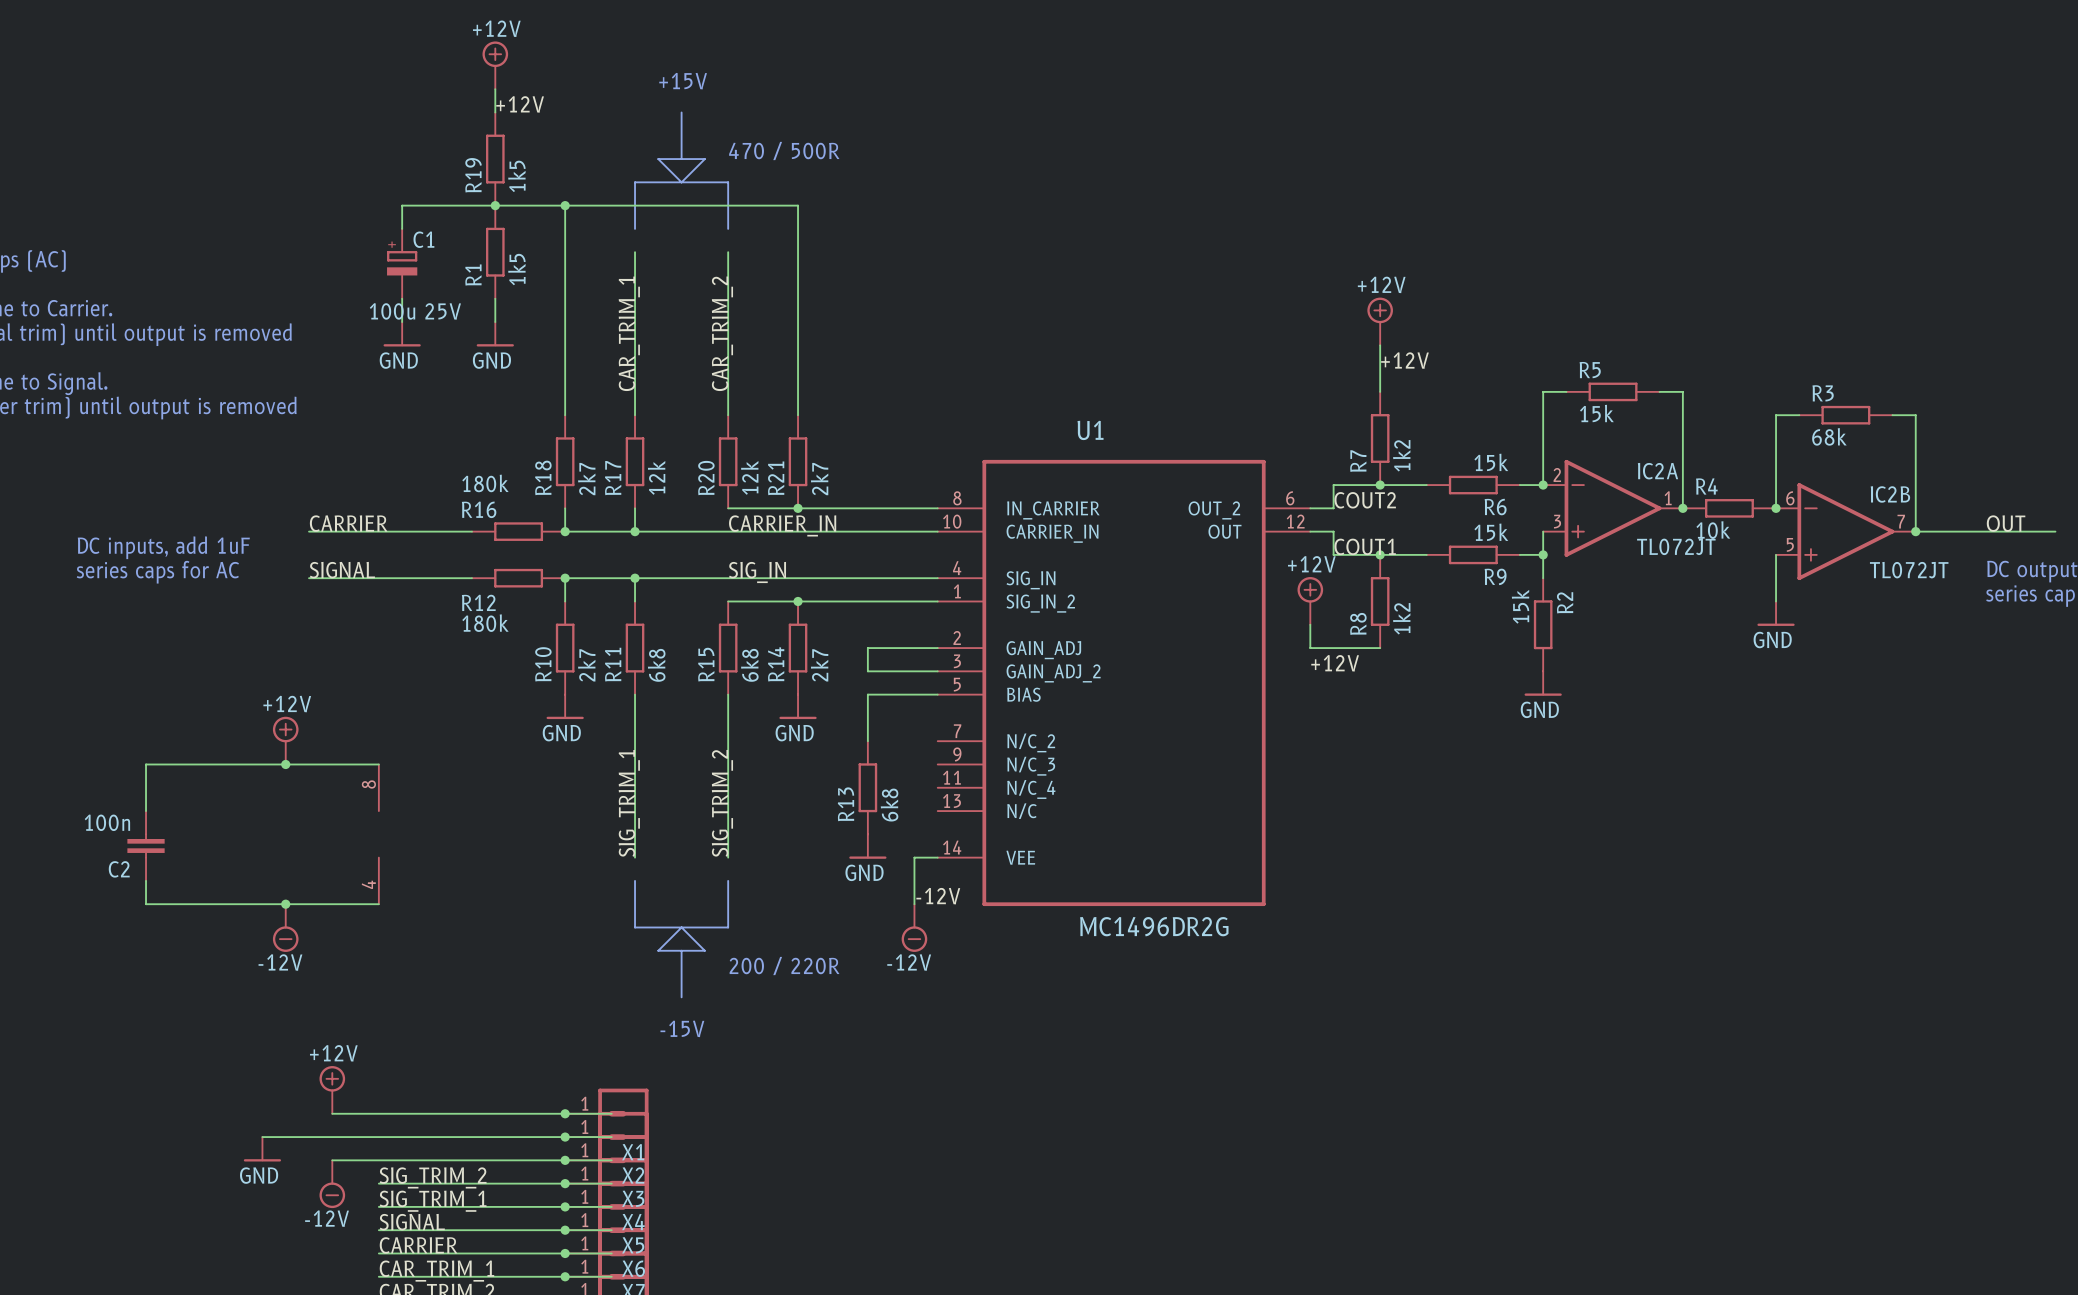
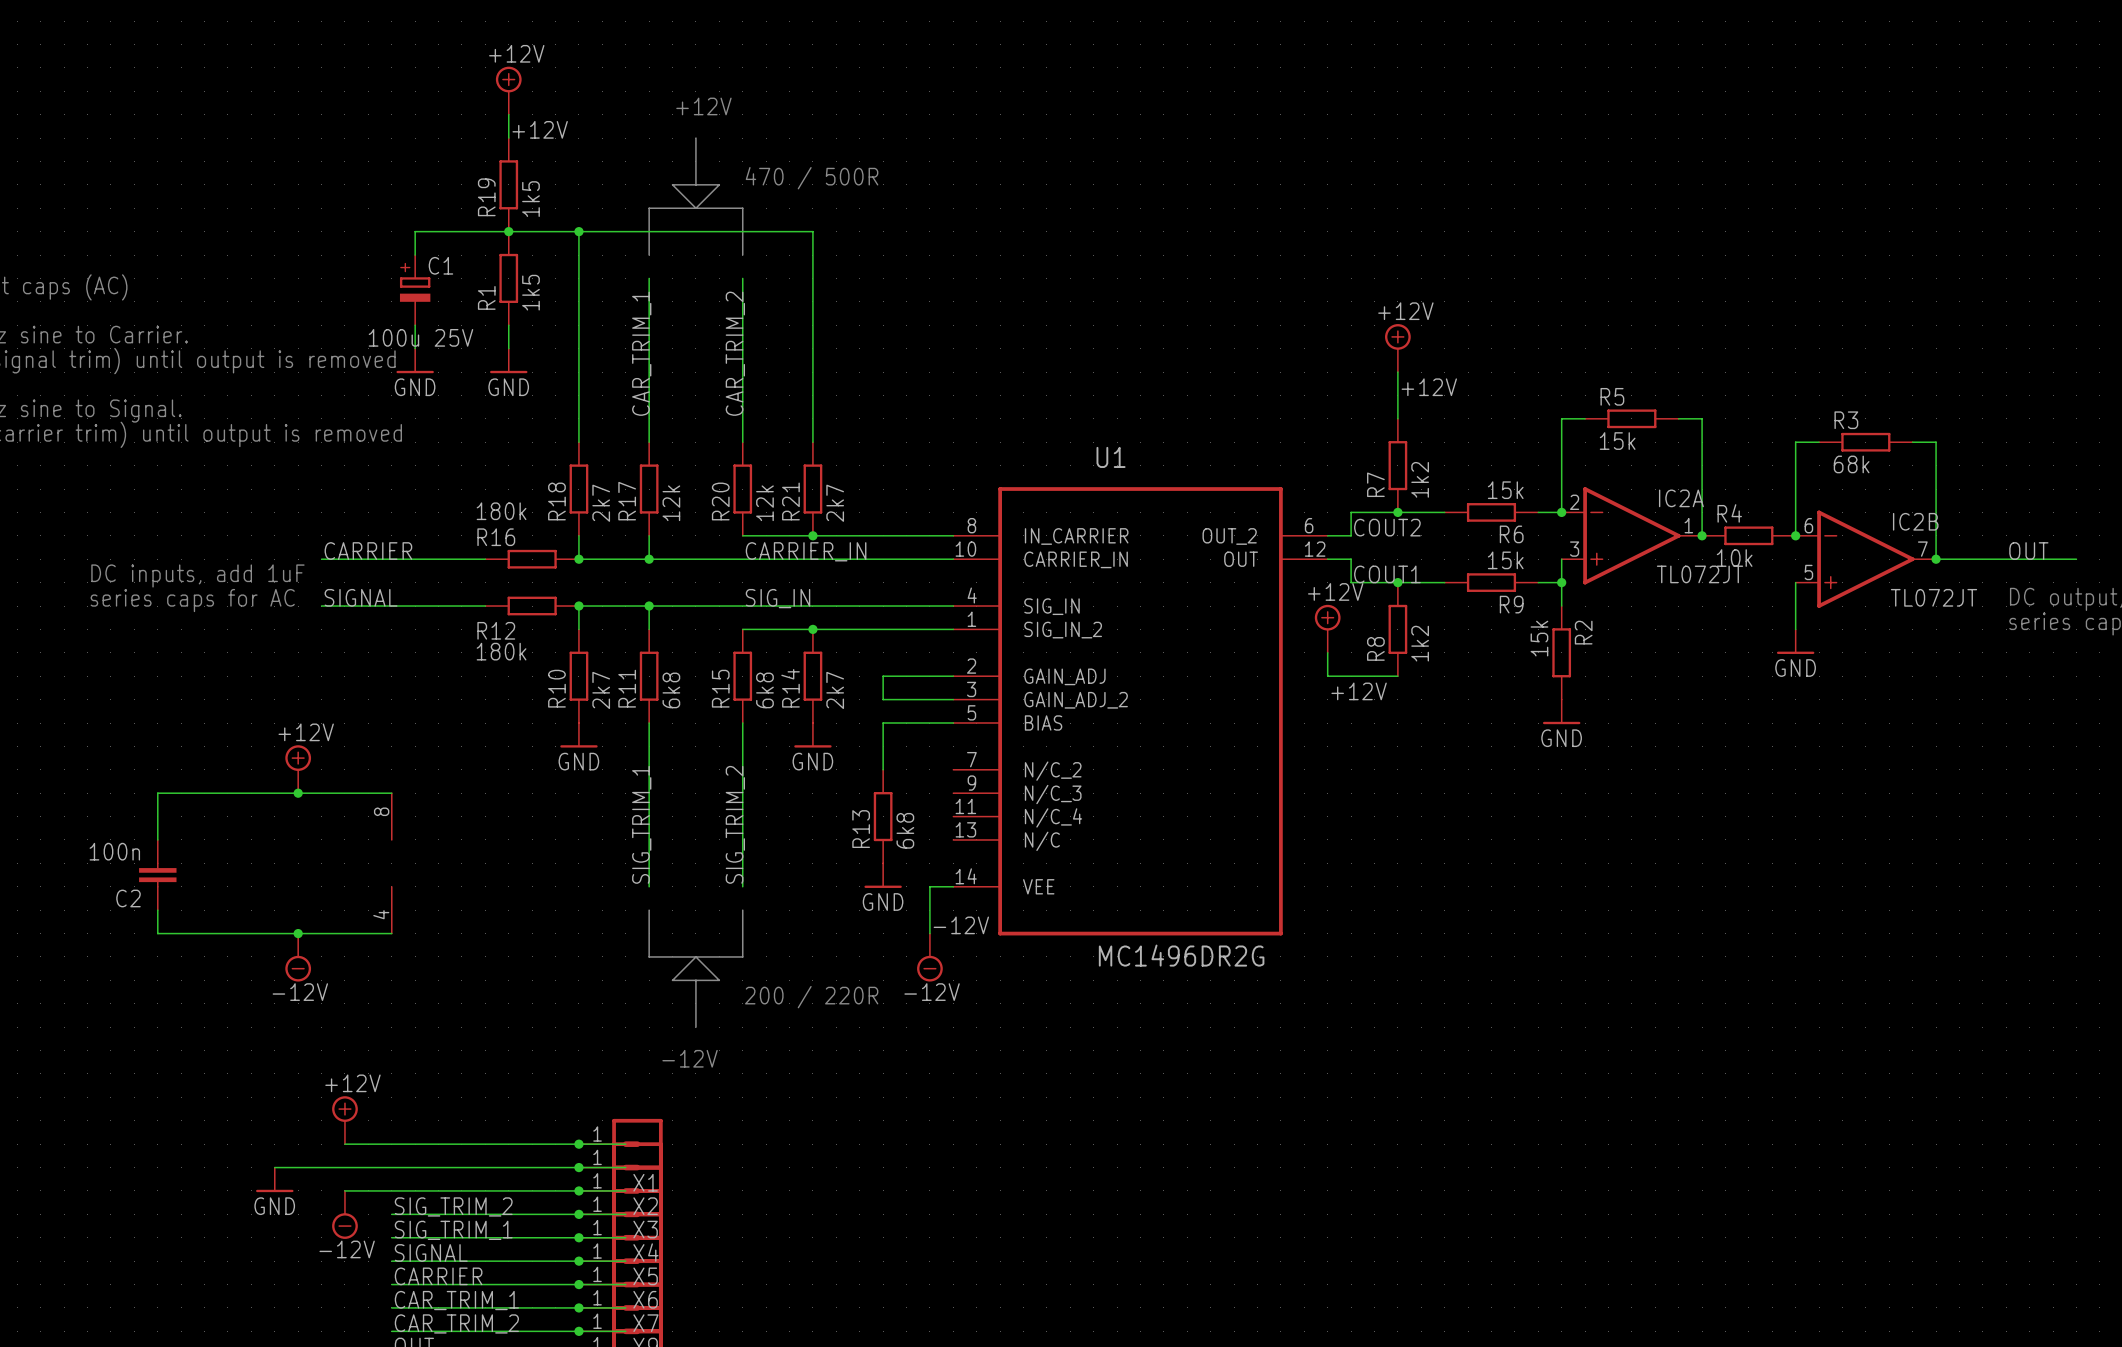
text: +15V (683, 81) -> +12V (703, 106)
text: -15V (682, 1028) -> -12V (690, 1058)

